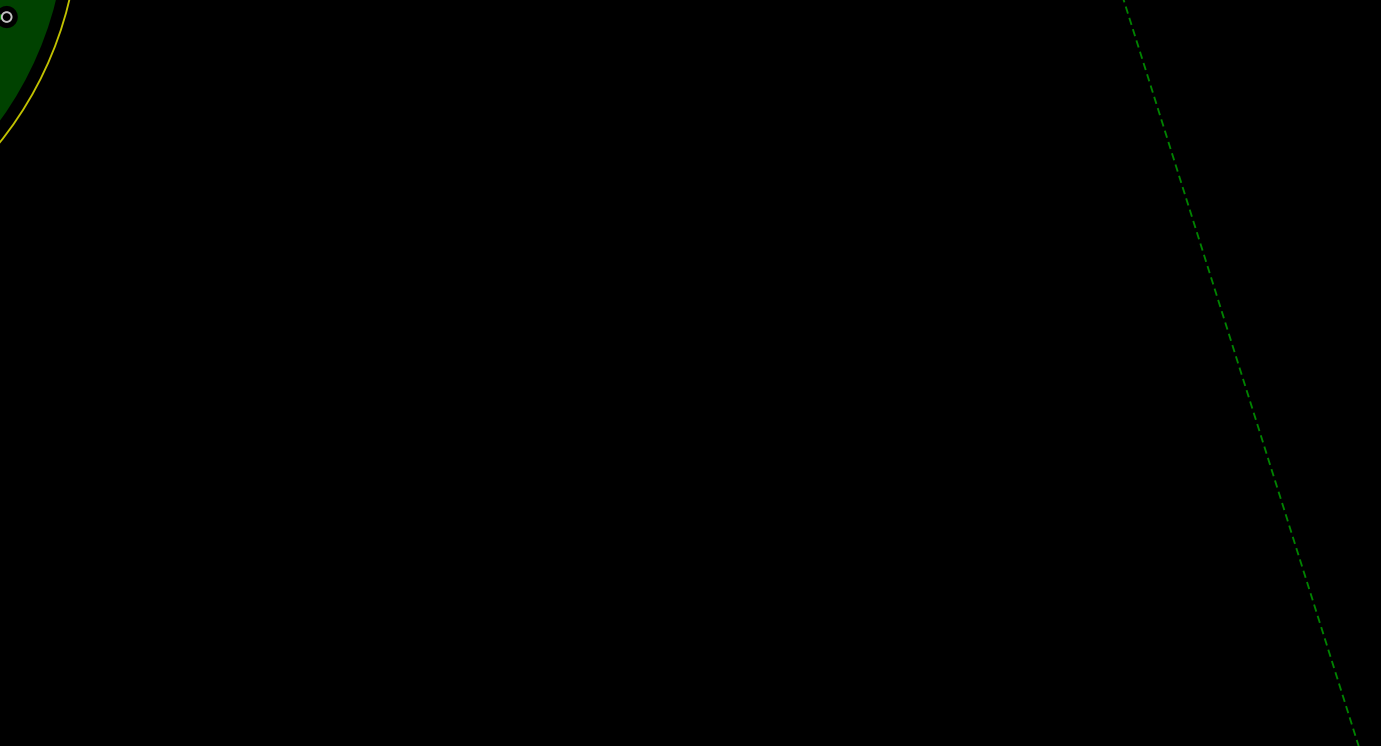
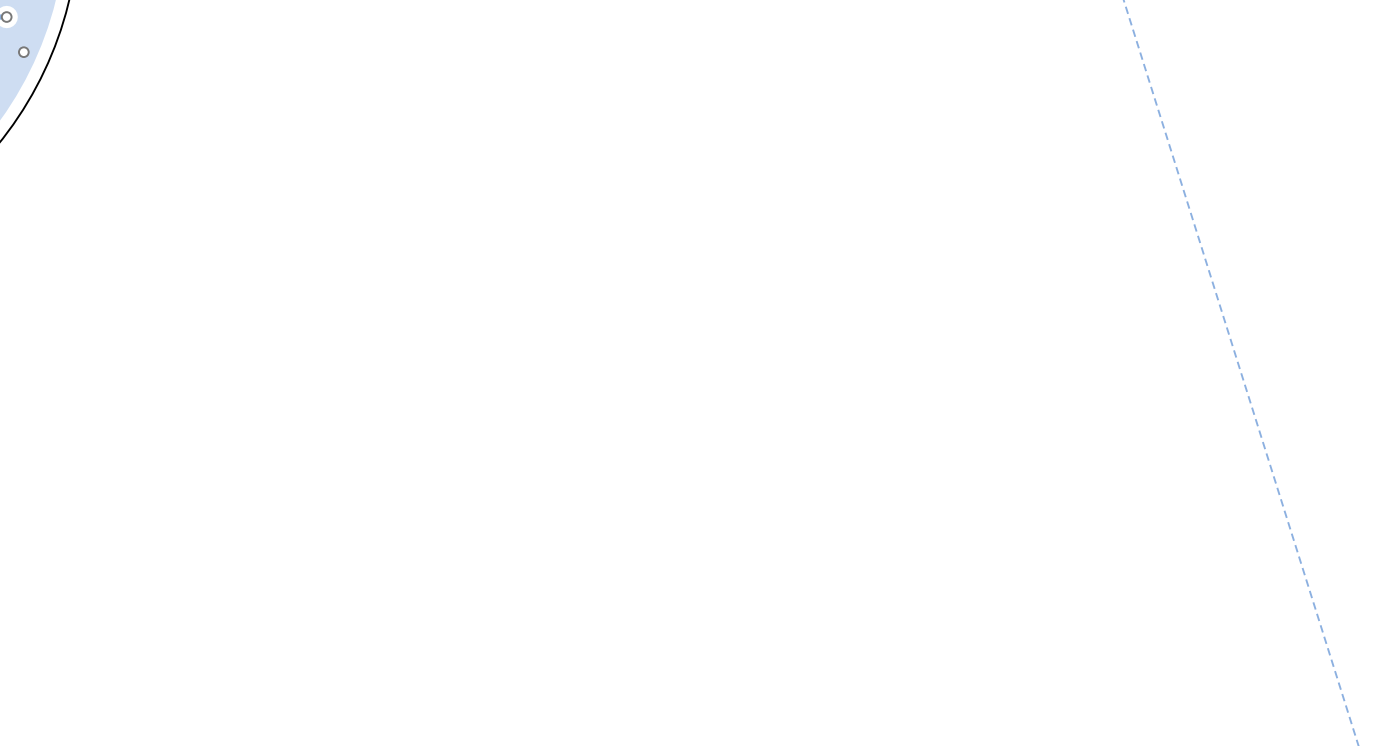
via: none -> (23, 52)

